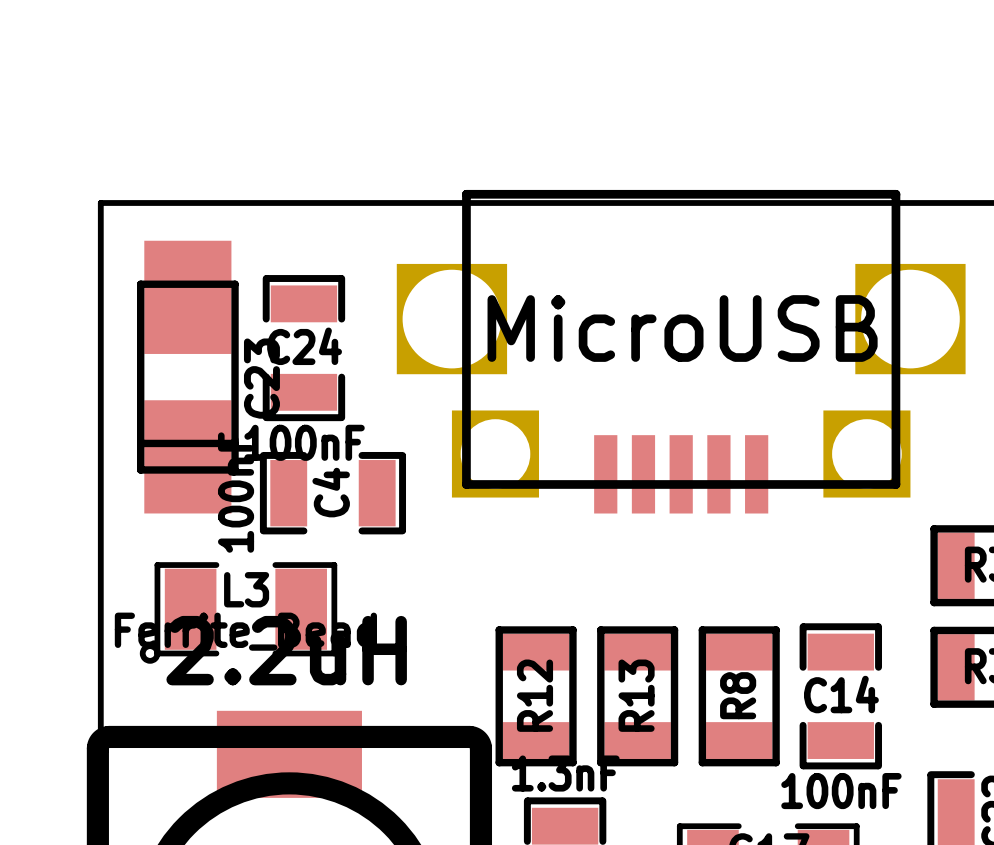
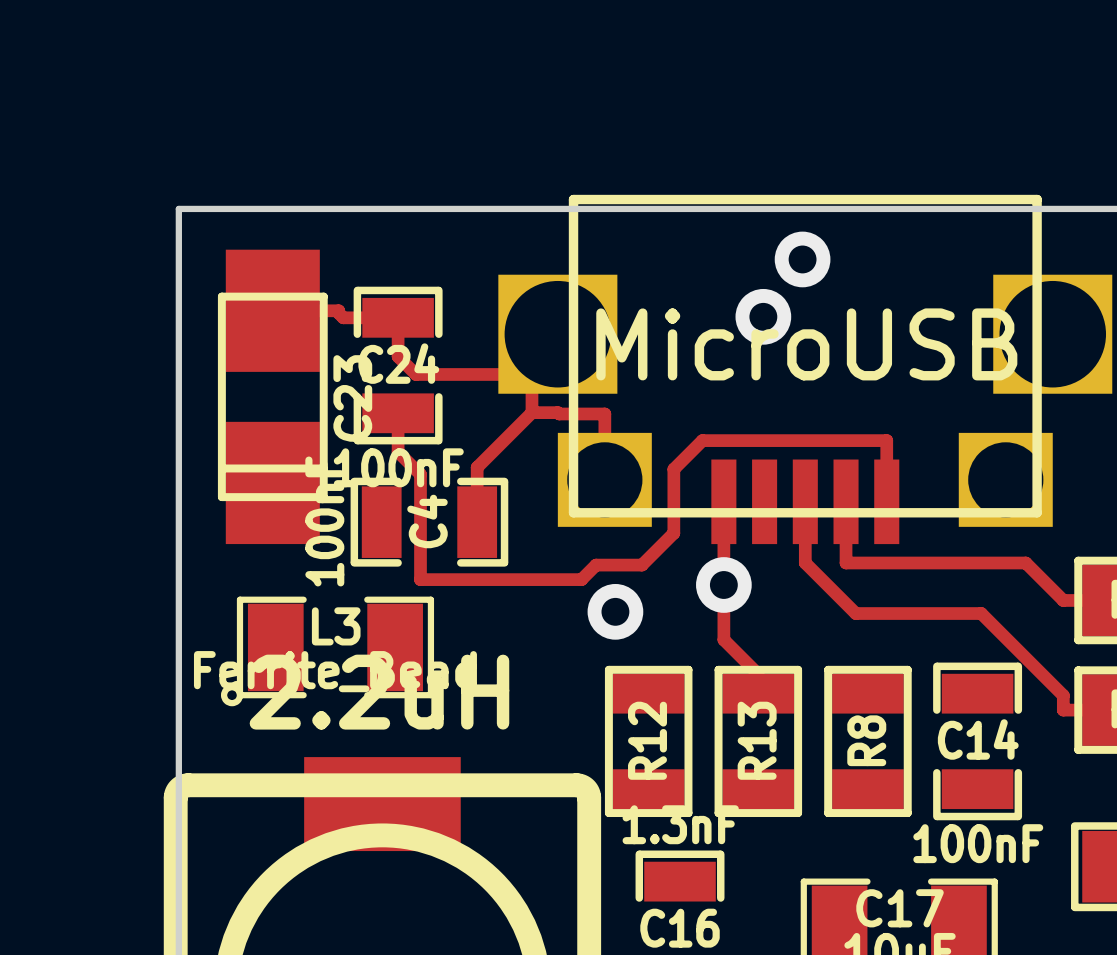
via: none -> (802, 259)
track: none -> (272, 310) (338, 310) (343, 317) (398, 317) (398, 356) (415, 374) (530, 374) (531, 376) (531, 412)
via: none -> (763, 316)
track: none -> (531, 412) (477, 467) (477, 522)
track: none -> (531, 412) (604, 413) (604, 479)
track: none -> (398, 413) (398, 452) (420, 474) (420, 579) (581, 579) (596, 565) (641, 565) (673, 533) (673, 469) (702, 440) (886, 440) (886, 501)
track: none -> (723, 501) (723, 639) (758, 674)
track: none -> (805, 501) (805, 562) (855, 613) (981, 613) (1063, 695) (1063, 710) (1102, 710)
track: none -> (846, 501) (846, 562) (1025, 562) (1063, 600) (1102, 600)
via: none -> (723, 584)
via: none -> (615, 611)

